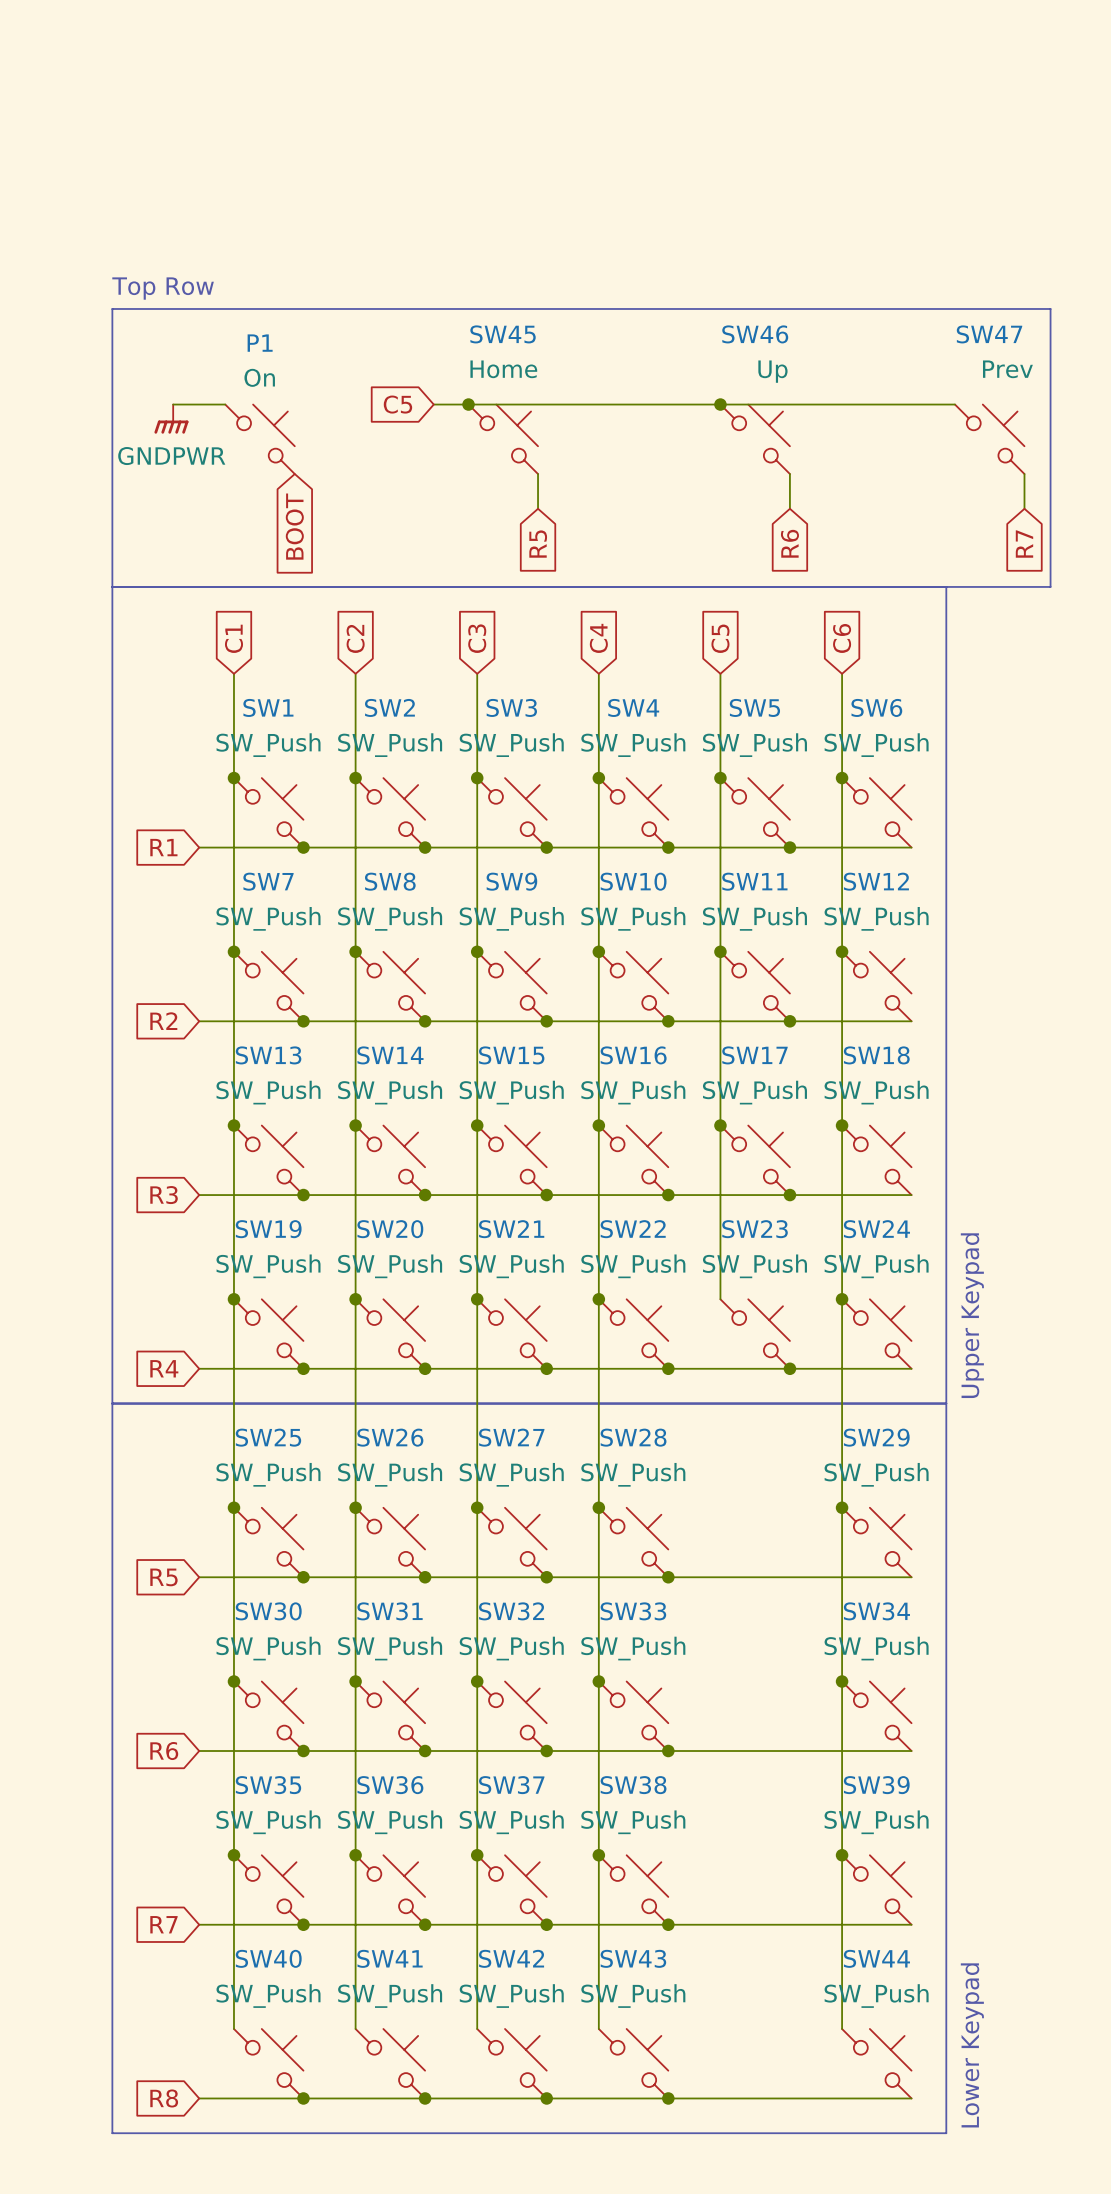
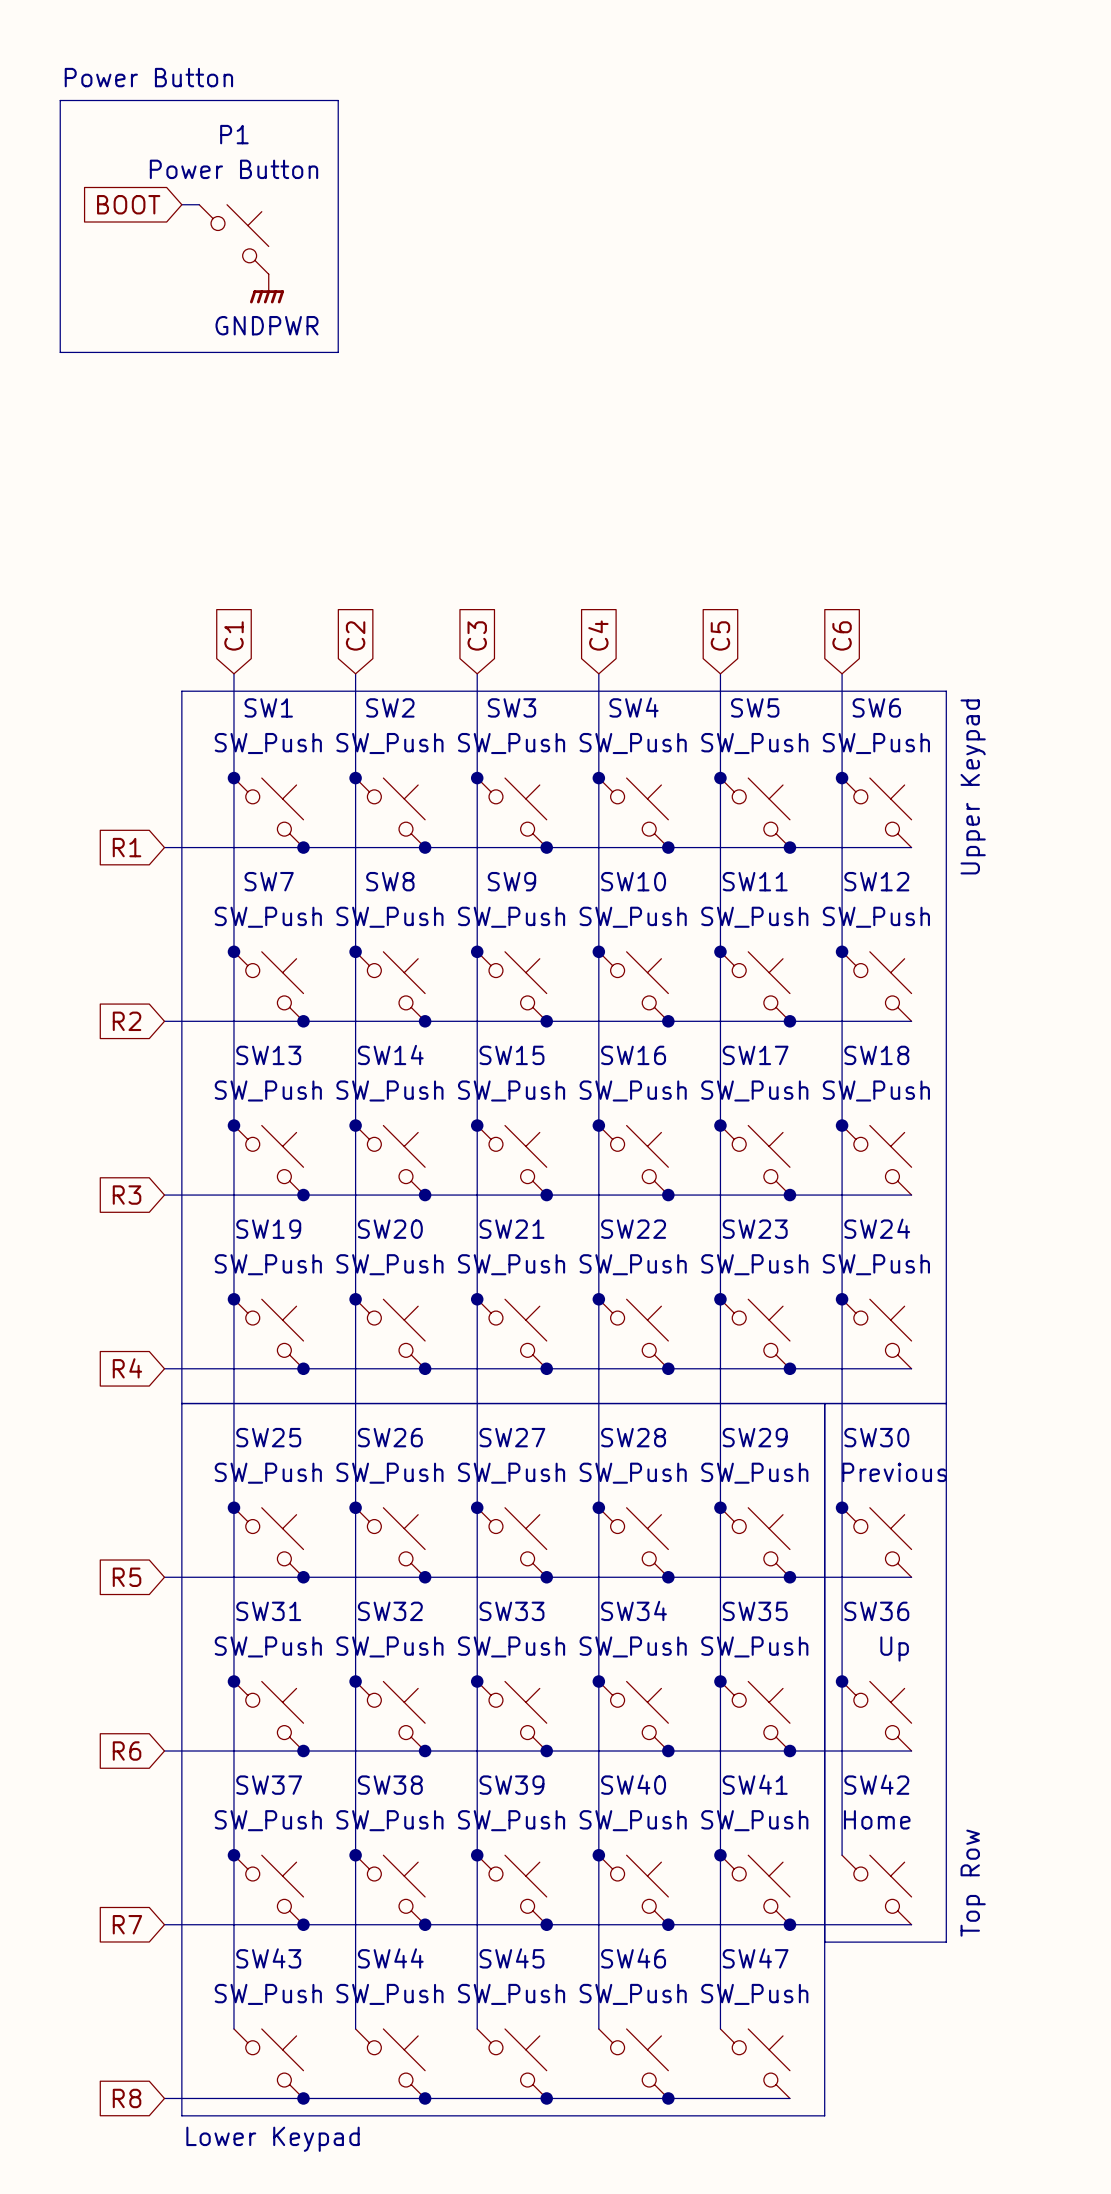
text: none -> Power Button (148, 77)
line: none -> (60, 100) (338, 100) (338, 352) (60, 352) (60, 100)
wire: none -> (181, 204) (199, 204)
text: Top Row (163, 288) -> none
P1 name position: P1 (260, 343) -> P1 (234, 134)
SW47 value: Prev (1007, 369) -> SW_Push (754, 1994)
P1 value: On (259, 377) -> Power Button (233, 169)
wire: (173, 404) (225, 404) -> none
global label: C5 (397, 404) -> none
wire: (433, 404) (954, 404) -> none
junction: (468, 404) -> none
junction: (720, 404) -> none
power symbol position: GNDPWR (171, 419) -> GNDPWR (266, 288)
P1 position: (260, 439) -> (233, 239)
SW45: Home (503, 439) -> none
SW46: Up (755, 439) -> none
SW47 position: (989, 439) -> (755, 2063)
wire: (538, 474) (538, 508) -> none
wire: (789, 474) (789, 508) -> none
wire: (1024, 474) (1024, 508) -> none
global label rotation: 0° (294, 526) -> 90° clockwise (128, 204)
global label position: BOOT (294, 526) -> BOOT (128, 204)
global label: R6 (789, 543) -> none
global label: R5 (538, 544) -> none
global label: R7 (1024, 544) -> none
line: (112, 586) (1050, 586) (1050, 308) (112, 308) (112, 2133) (946, 2133) (946, 1942) -> (824, 1942) (946, 1942)
line: (946, 586) (946, 691) -> (824, 1403) (824, 2115) (181, 2115) (181, 691) (946, 691)
text: none -> Upper Keypad (973, 786)
global label position: R1 (163, 847) -> R1 (127, 847)
wire: none -> (164, 847) (199, 847)
global label position: R2 (163, 1021) -> R2 (127, 1021)
wire: none -> (164, 1021) (199, 1021)
wire: none -> (164, 1195) (199, 1195)
global label position: R3 (164, 1195) -> R3 (127, 1195)
wire: none -> (720, 1299) (720, 2028)
junction: none -> (720, 1299)
text: Upper Keypad (972, 1315) -> none
wire: none -> (164, 1368) (199, 1368)
global label position: R4 (164, 1368) -> R4 (127, 1368)
line: (112, 1403) (181, 1403) -> none
SW29 name: SW29 (876, 1437) -> SW30 (876, 1437)
SW29 value: SW_Push (876, 1474) -> Previous (894, 1472)
junction: none -> (720, 1507)
SW29: none -> SW_Push (755, 1542)
global label position: R5 (163, 1577) -> R5 (127, 1577)
wire: none -> (164, 1577) (199, 1577)
junction: none -> (789, 1577)
SW30 name: SW30 (268, 1611) -> SW31 (268, 1611)
SW31 name: SW31 (390, 1611) -> SW32 (390, 1611)
SW32 name: SW32 (511, 1611) -> SW33 (511, 1611)
SW33 name: SW33 (633, 1611) -> SW34 (633, 1610)
SW34 name: SW34 (876, 1611) -> SW36 (876, 1611)
SW34 value: SW_Push (876, 1648) -> Up (894, 1649)
junction: none -> (720, 1681)
SW35: none -> SW_Push (755, 1716)
wire: none -> (164, 1751) (199, 1751)
global label position: R6 (164, 1751) -> R6 (127, 1751)
junction: none -> (789, 1751)
SW35 name: SW35 (268, 1785) -> SW37 (269, 1785)
SW36 name: SW36 (390, 1785) -> SW38 (390, 1785)
SW37 name: SW37 (511, 1785) -> SW39 (511, 1785)
SW38 name: SW38 (633, 1785) -> SW40 (633, 1784)
SW39 name: SW39 (876, 1785) -> SW42 (876, 1784)
SW39 value: SW_Push (876, 1822) -> Home (877, 1819)
junction: none -> (720, 1855)
wire: (842, 1855) (842, 2028) -> none
junction: (842, 1855) -> none
text: none -> Top Row (973, 1883)
SW41: none -> SW_Push (755, 1889)
global label position: R7 (163, 1924) -> R7 (127, 1924)
wire: none -> (164, 1924) (199, 1924)
junction: none -> (789, 1924)
SW40 name: SW40 (268, 1958) -> SW43 (268, 1958)
SW41 name: SW41 (390, 1958) -> SW44 (390, 1958)
SW42 name: SW42 (511, 1958) -> SW45 (511, 1958)
SW43 name: SW43 (633, 1958) -> SW46 (633, 1958)
text: Lower Keypad (972, 2045) -> none
SW44: SW_Push (876, 2063) -> none
wire: none -> (164, 2098) (199, 2098)
global label position: R8 (164, 2098) -> R8 (127, 2098)
wire: (789, 2098) (911, 2098) -> none
text: none -> Lower Keypad (273, 2139)

